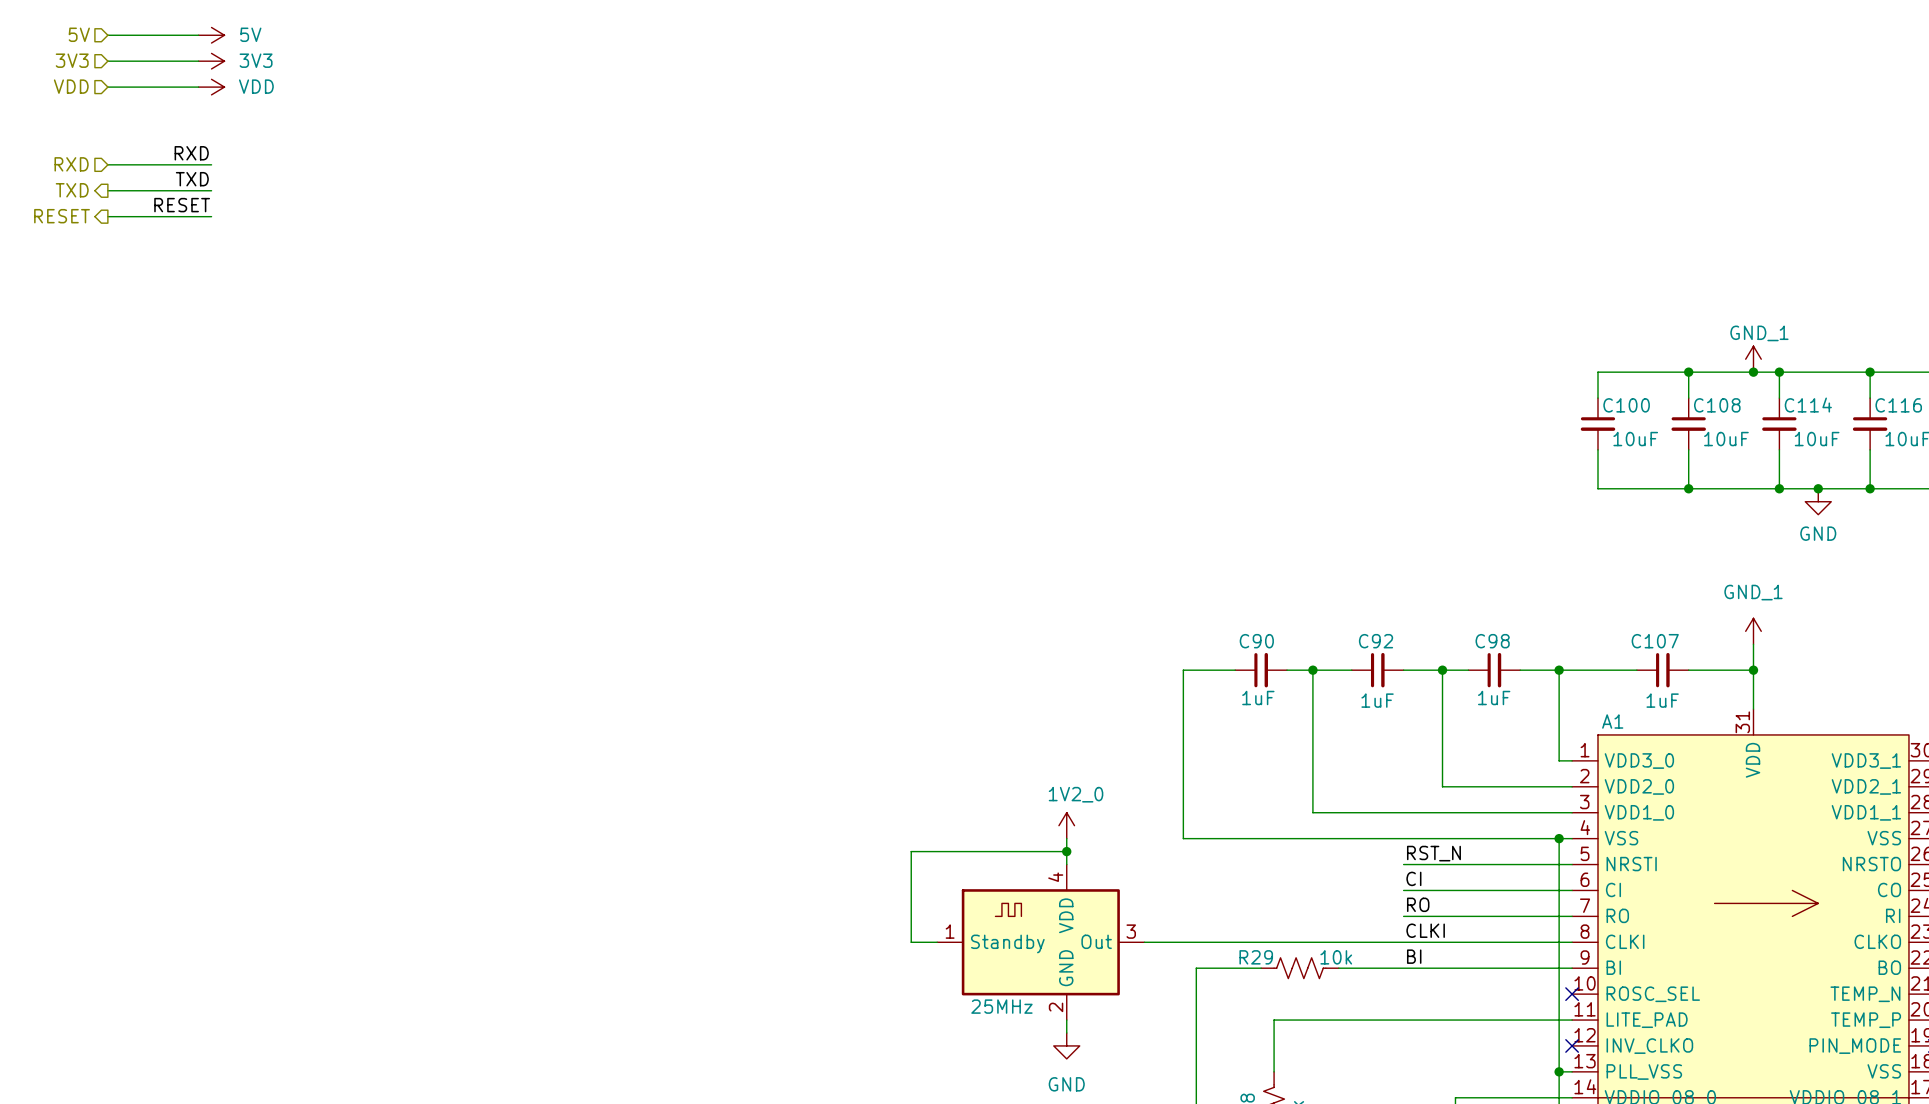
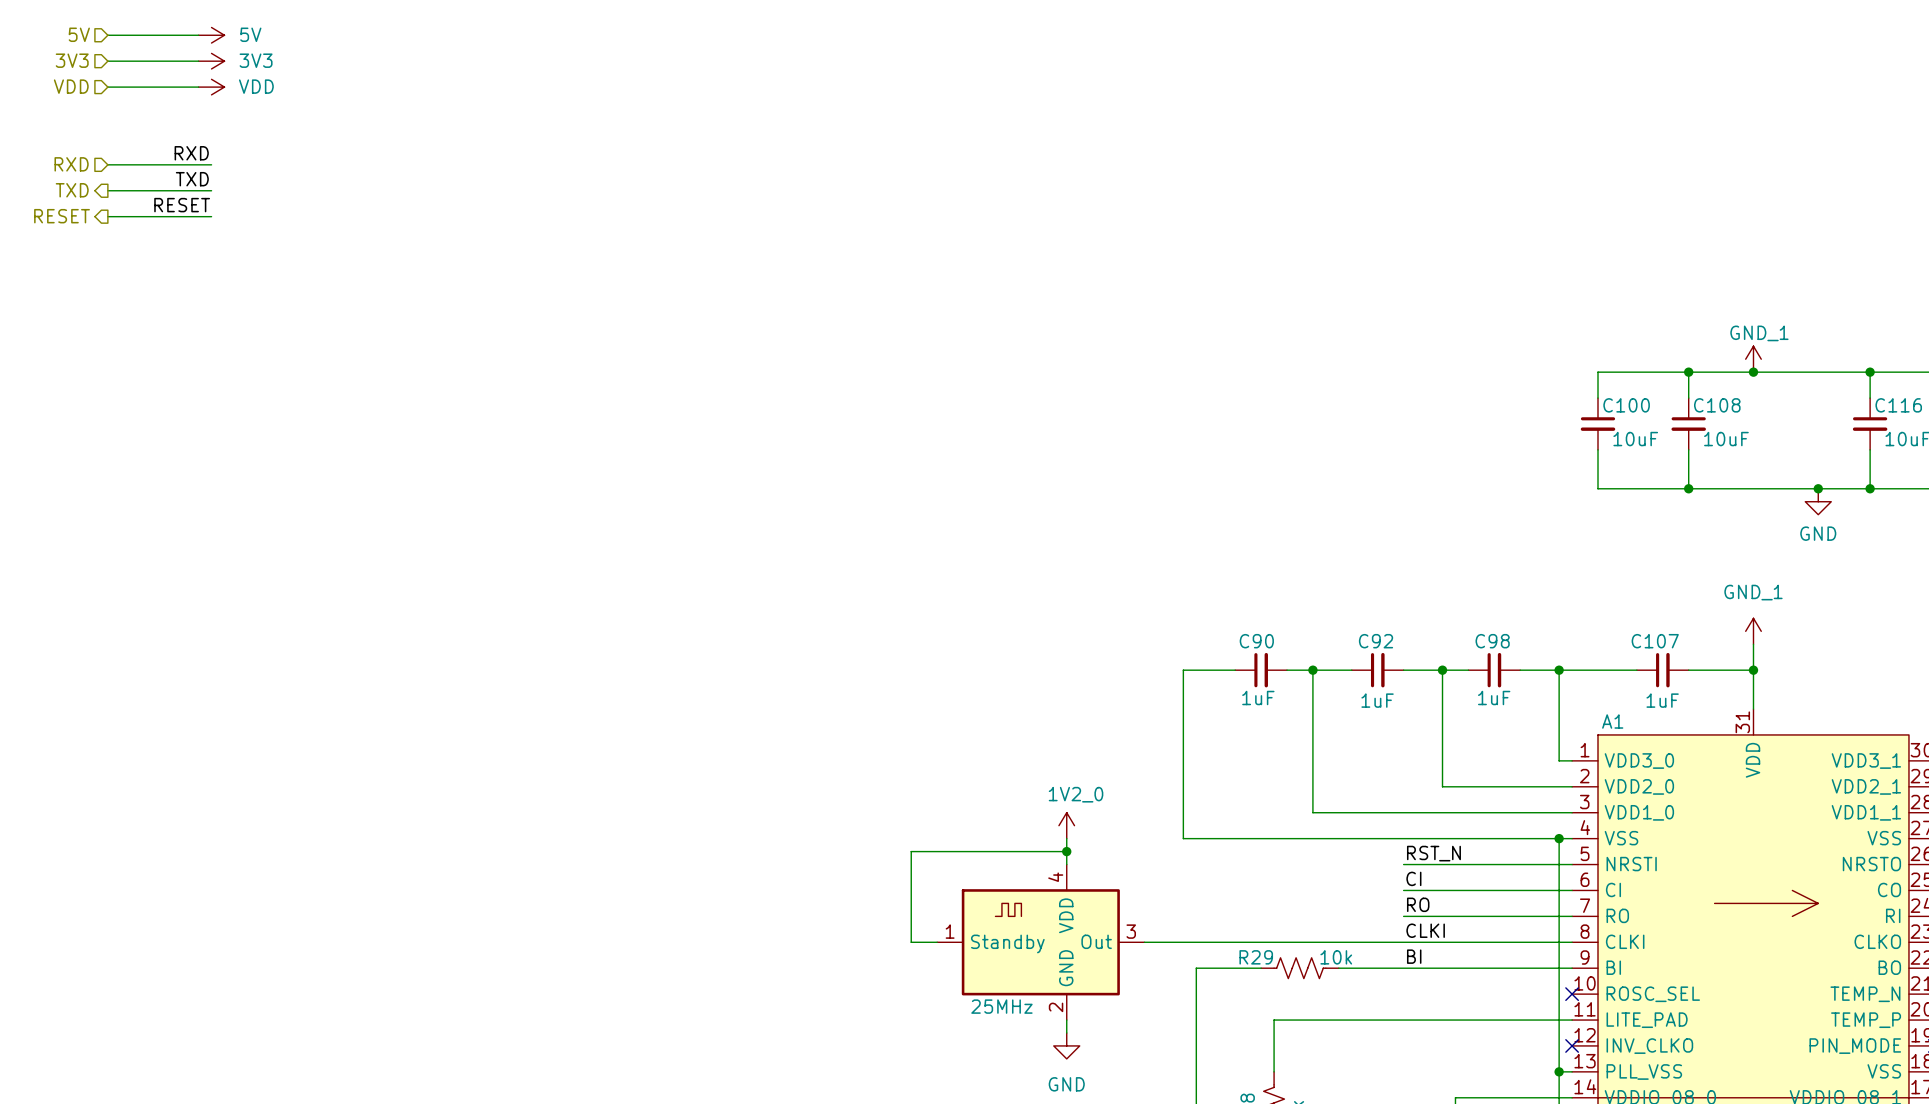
wire: (1779, 372) (1779, 398) -> none
junction: (1779, 372) -> none
C114: 10uF (1779, 423) -> none
wire: (1779, 449) (1779, 488) -> none
junction: (1779, 488) -> none

